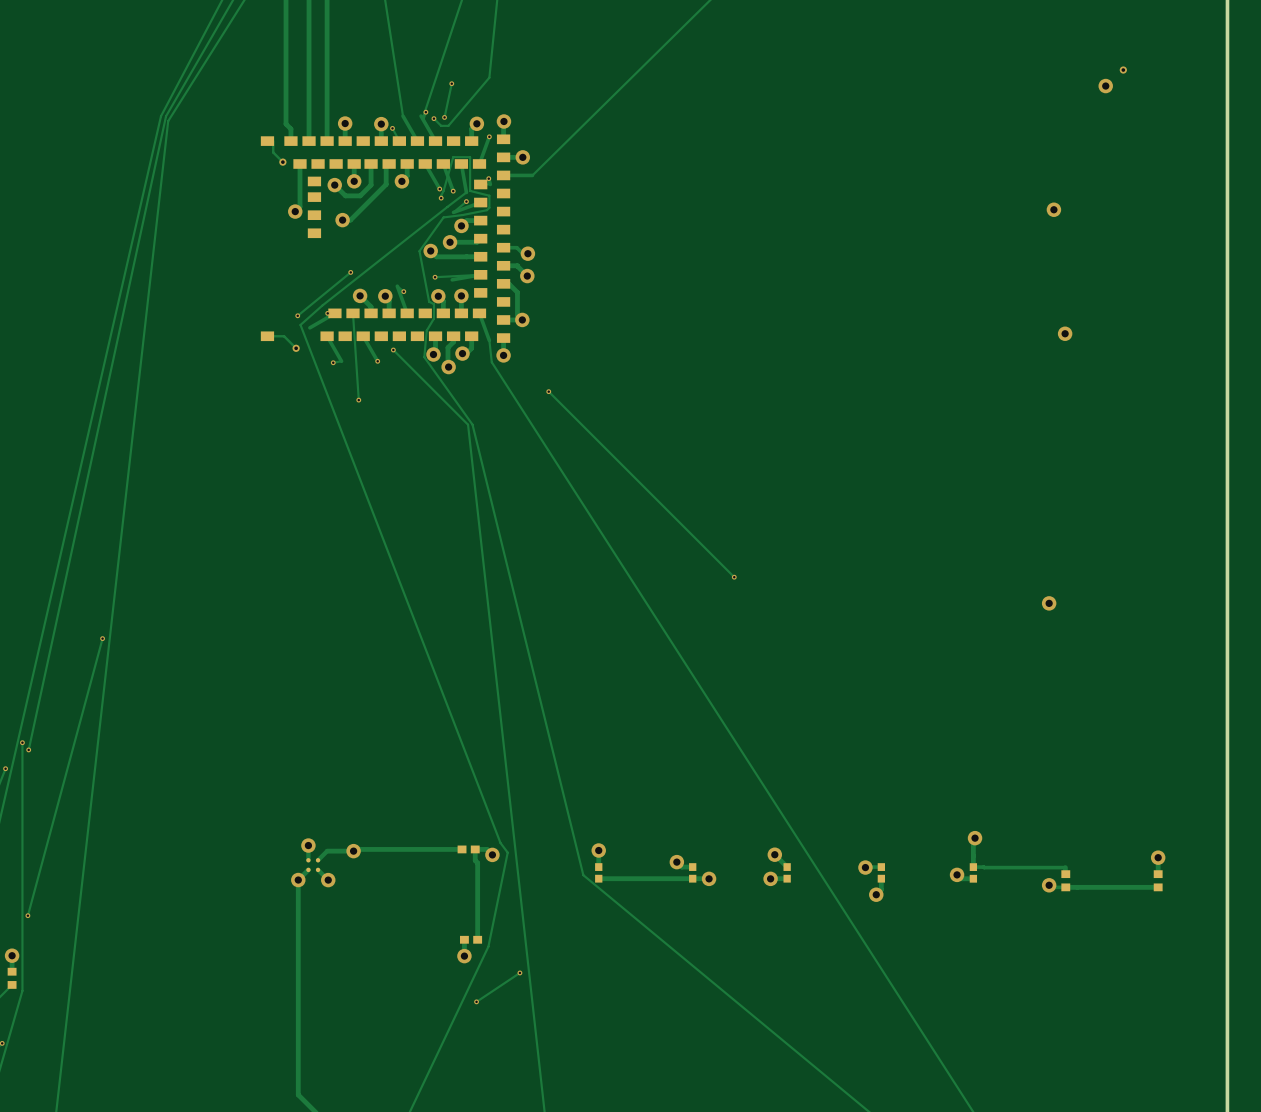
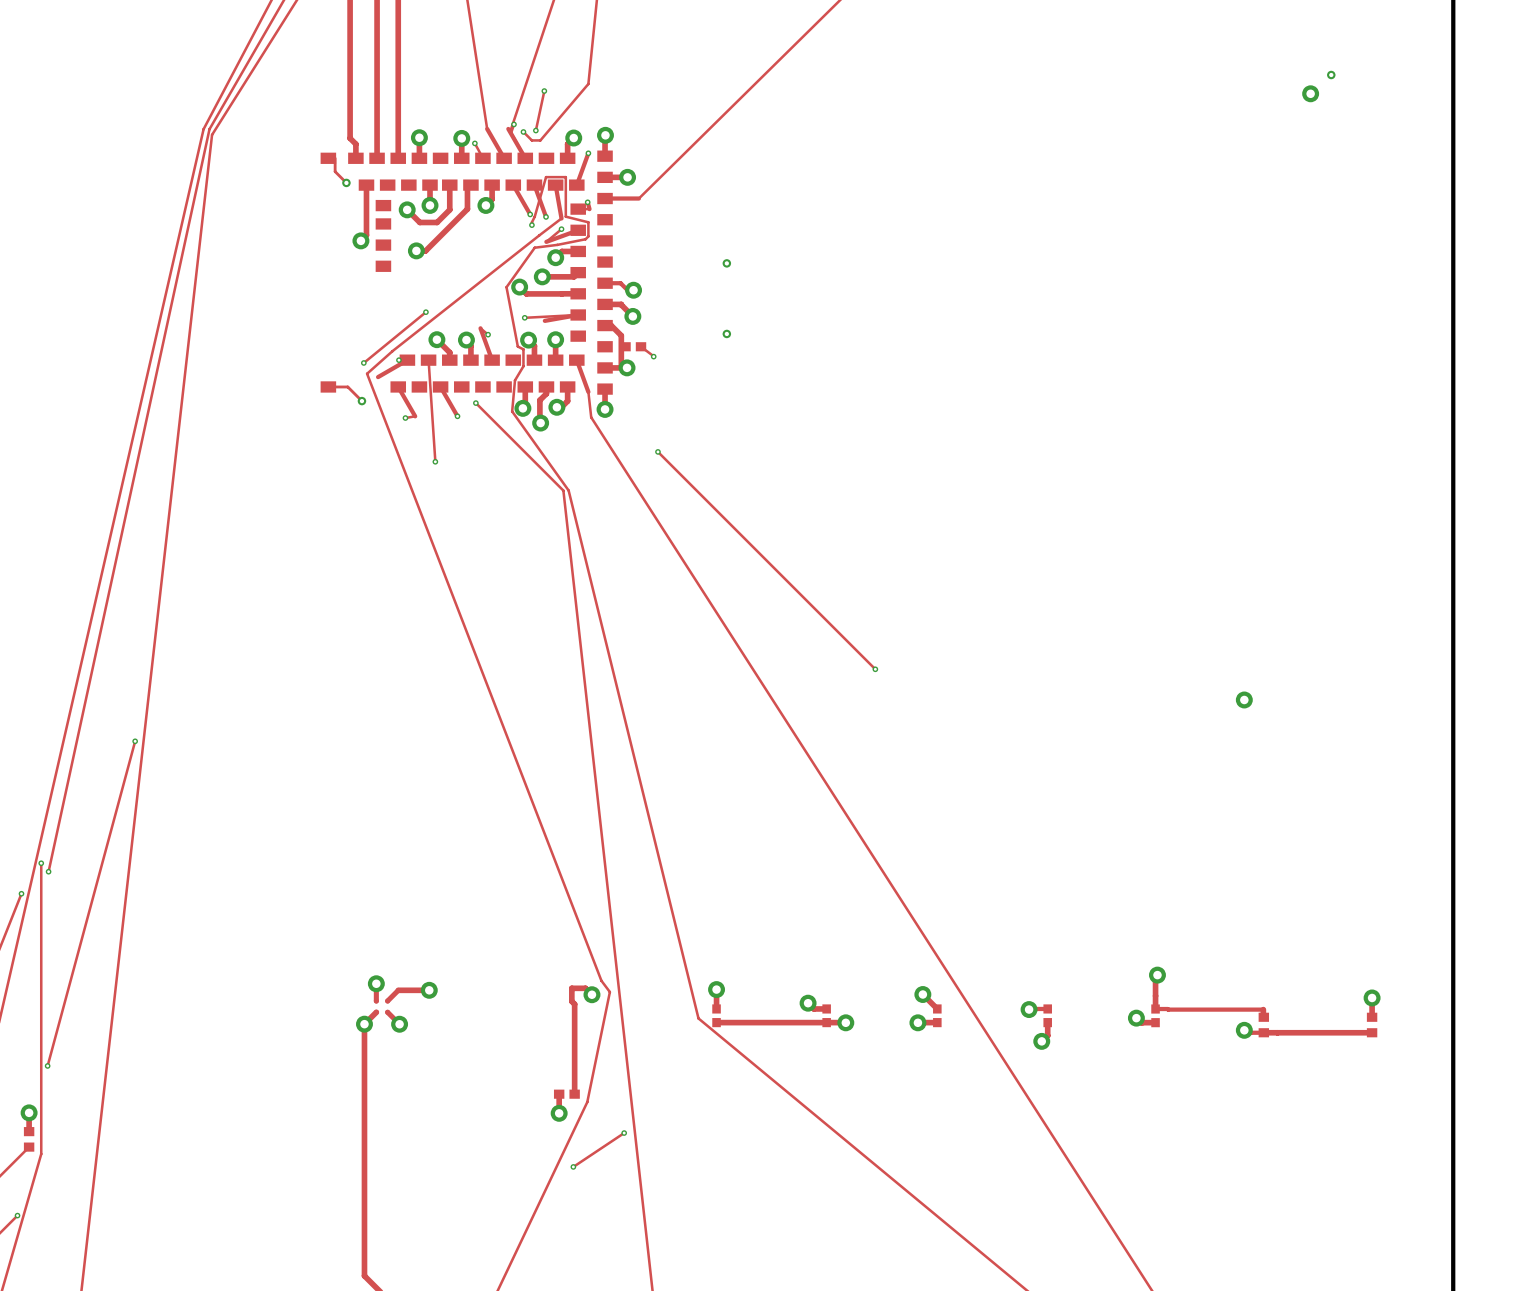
via: (1053, 209) -> none
via: none -> (726, 263)
via: none -> (726, 333)
track: none -> (641, 346) (652, 355)
via: none -> (653, 356)
via: (1065, 333) -> none
track: (355, 849) (462, 849) -> none
part position: (468, 849) -> (633, 346)

